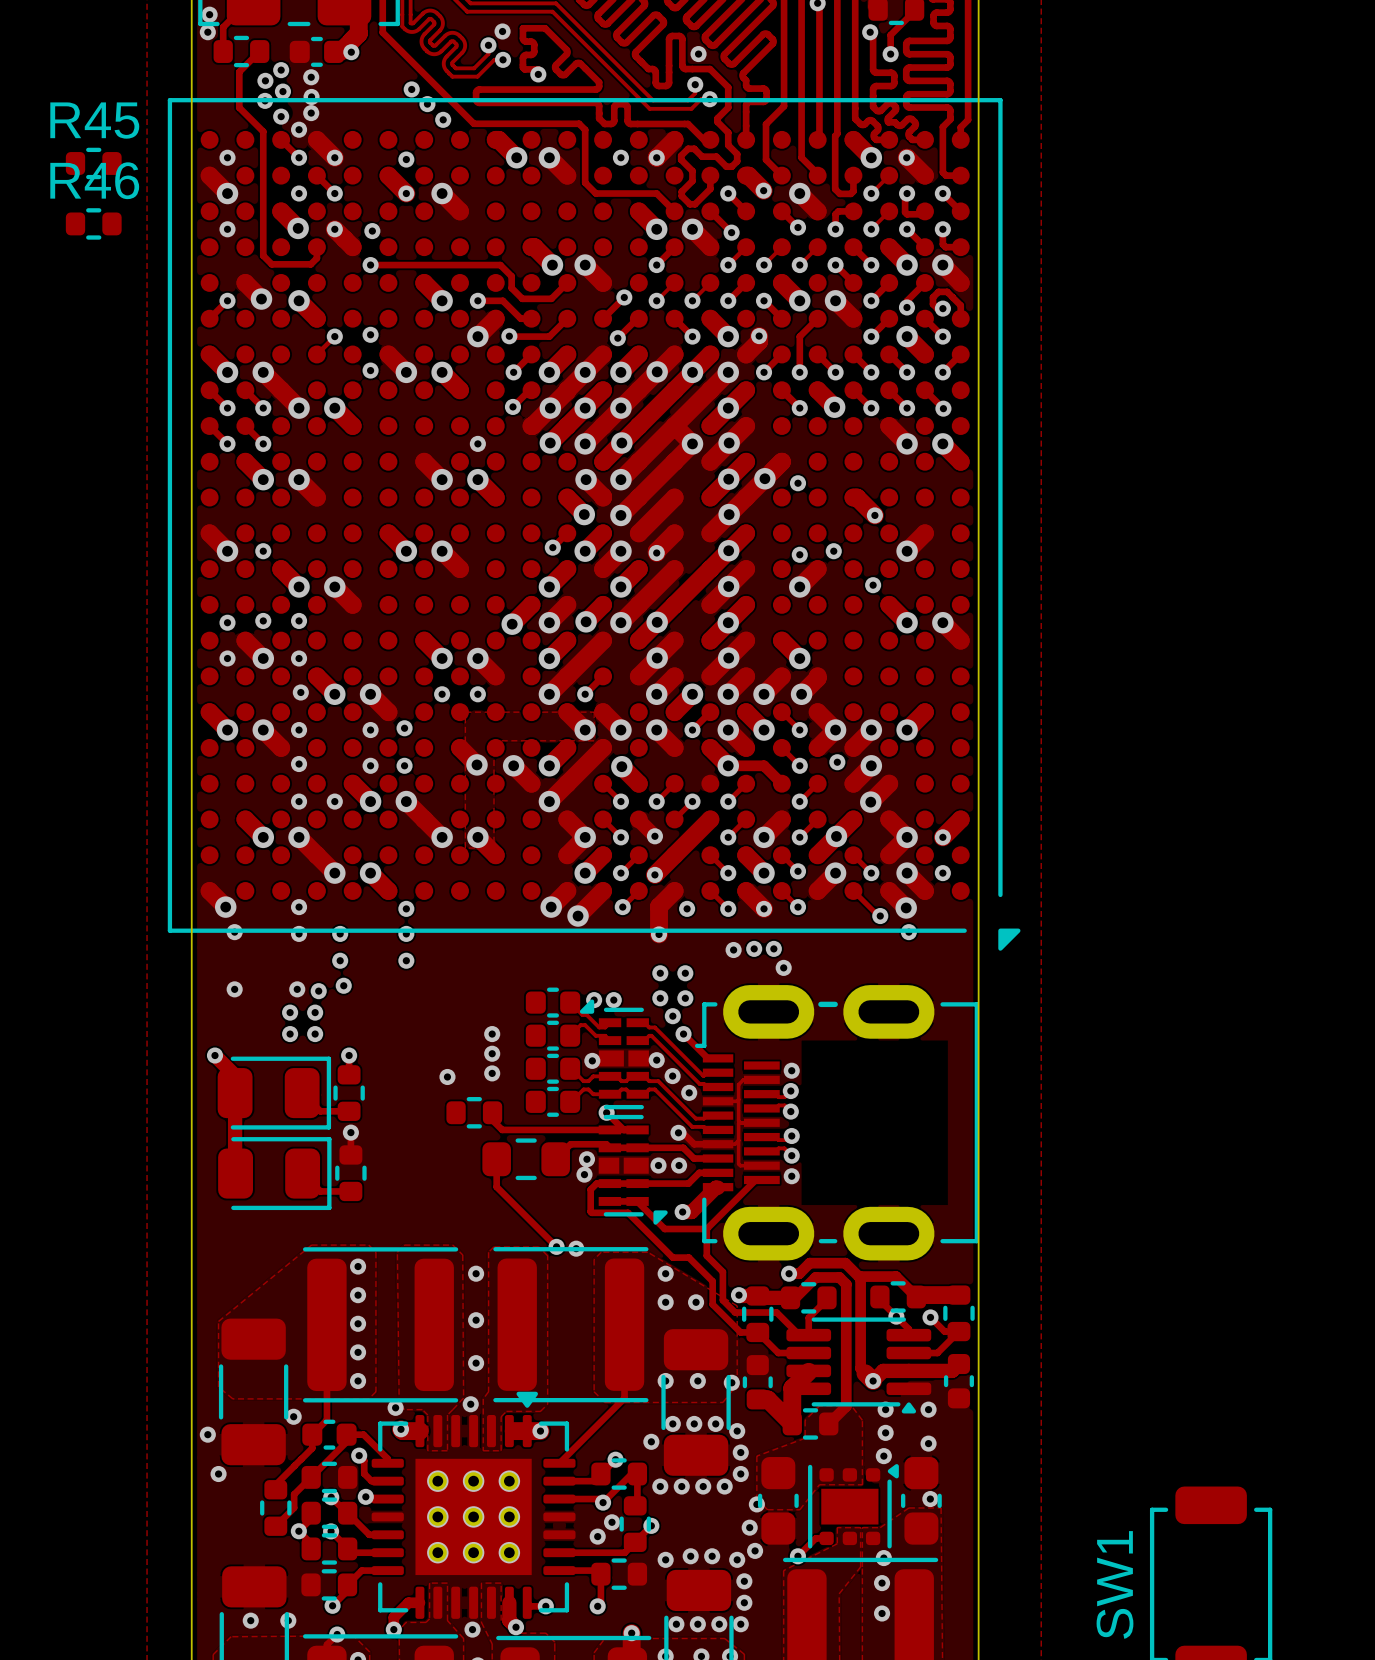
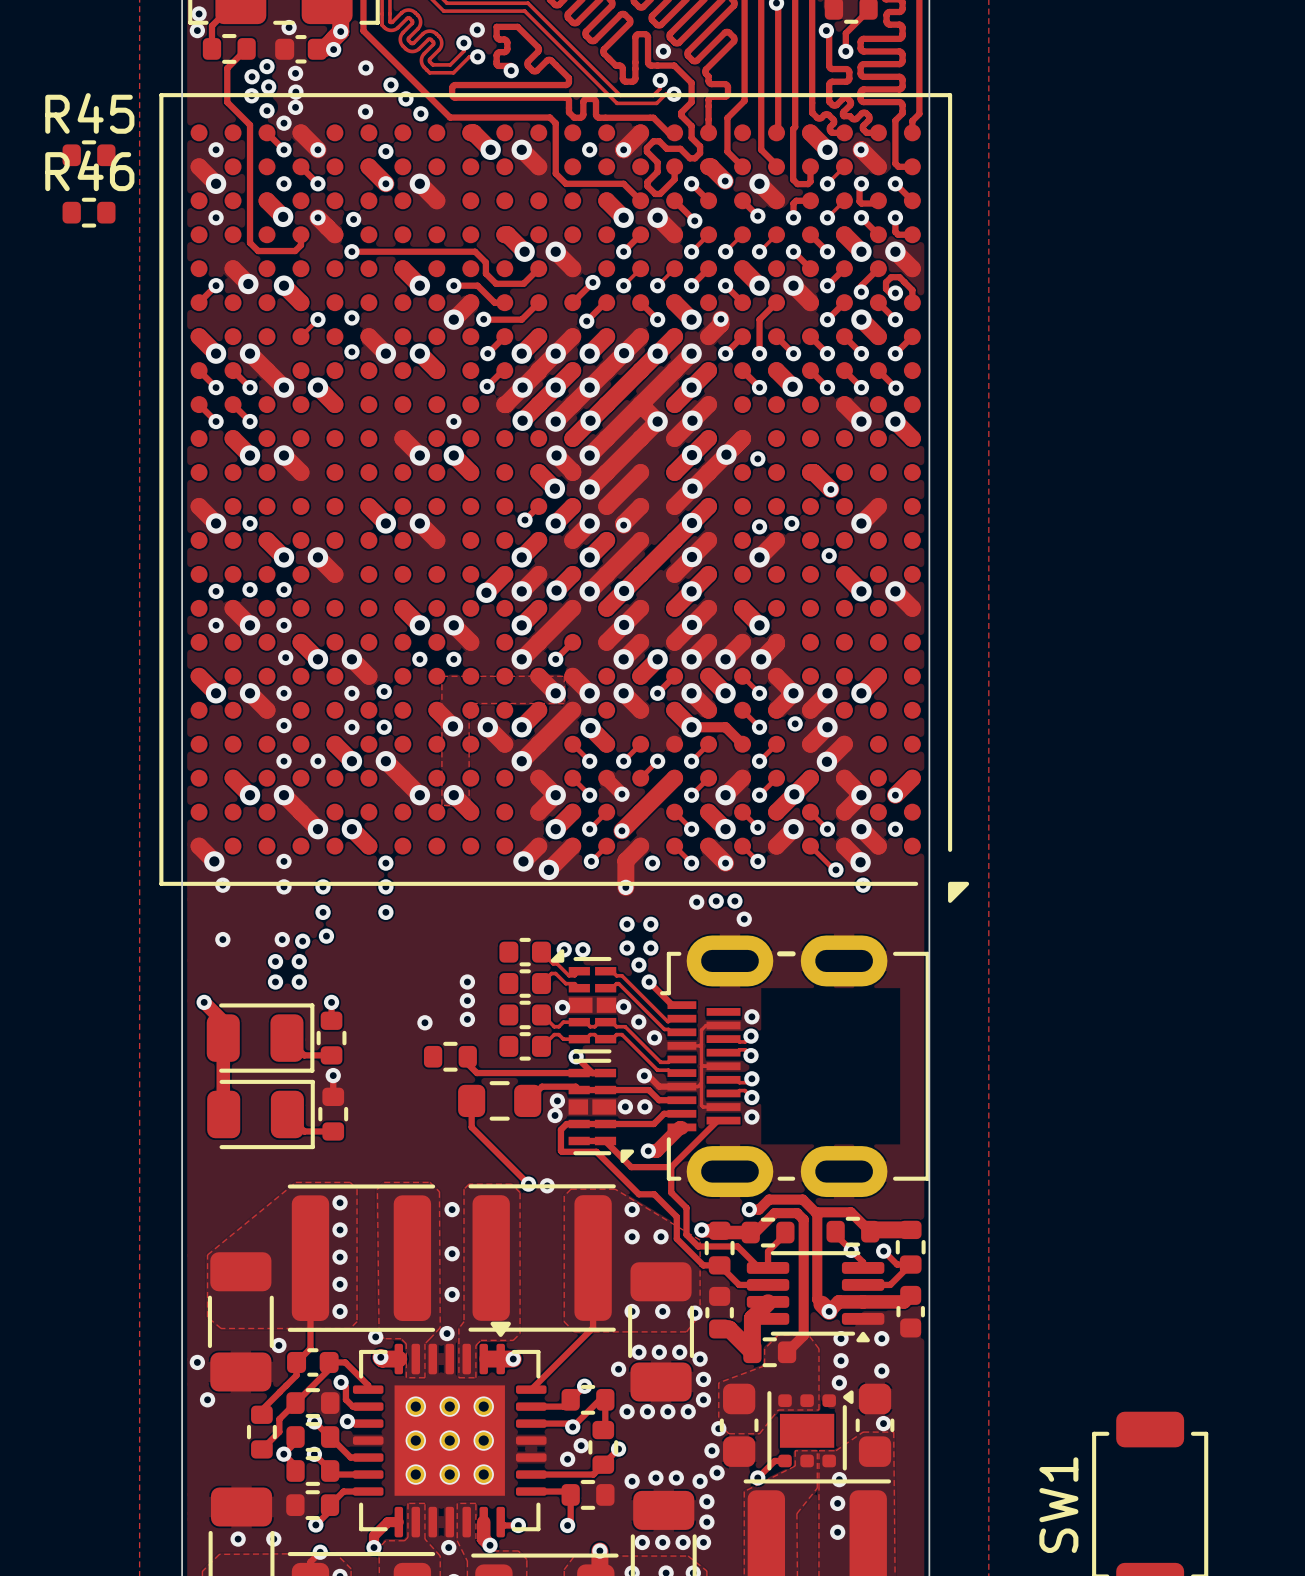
via: none -> (289, 27)
via: none -> (340, 31)
via: none -> (365, 67)
via: none -> (365, 111)

